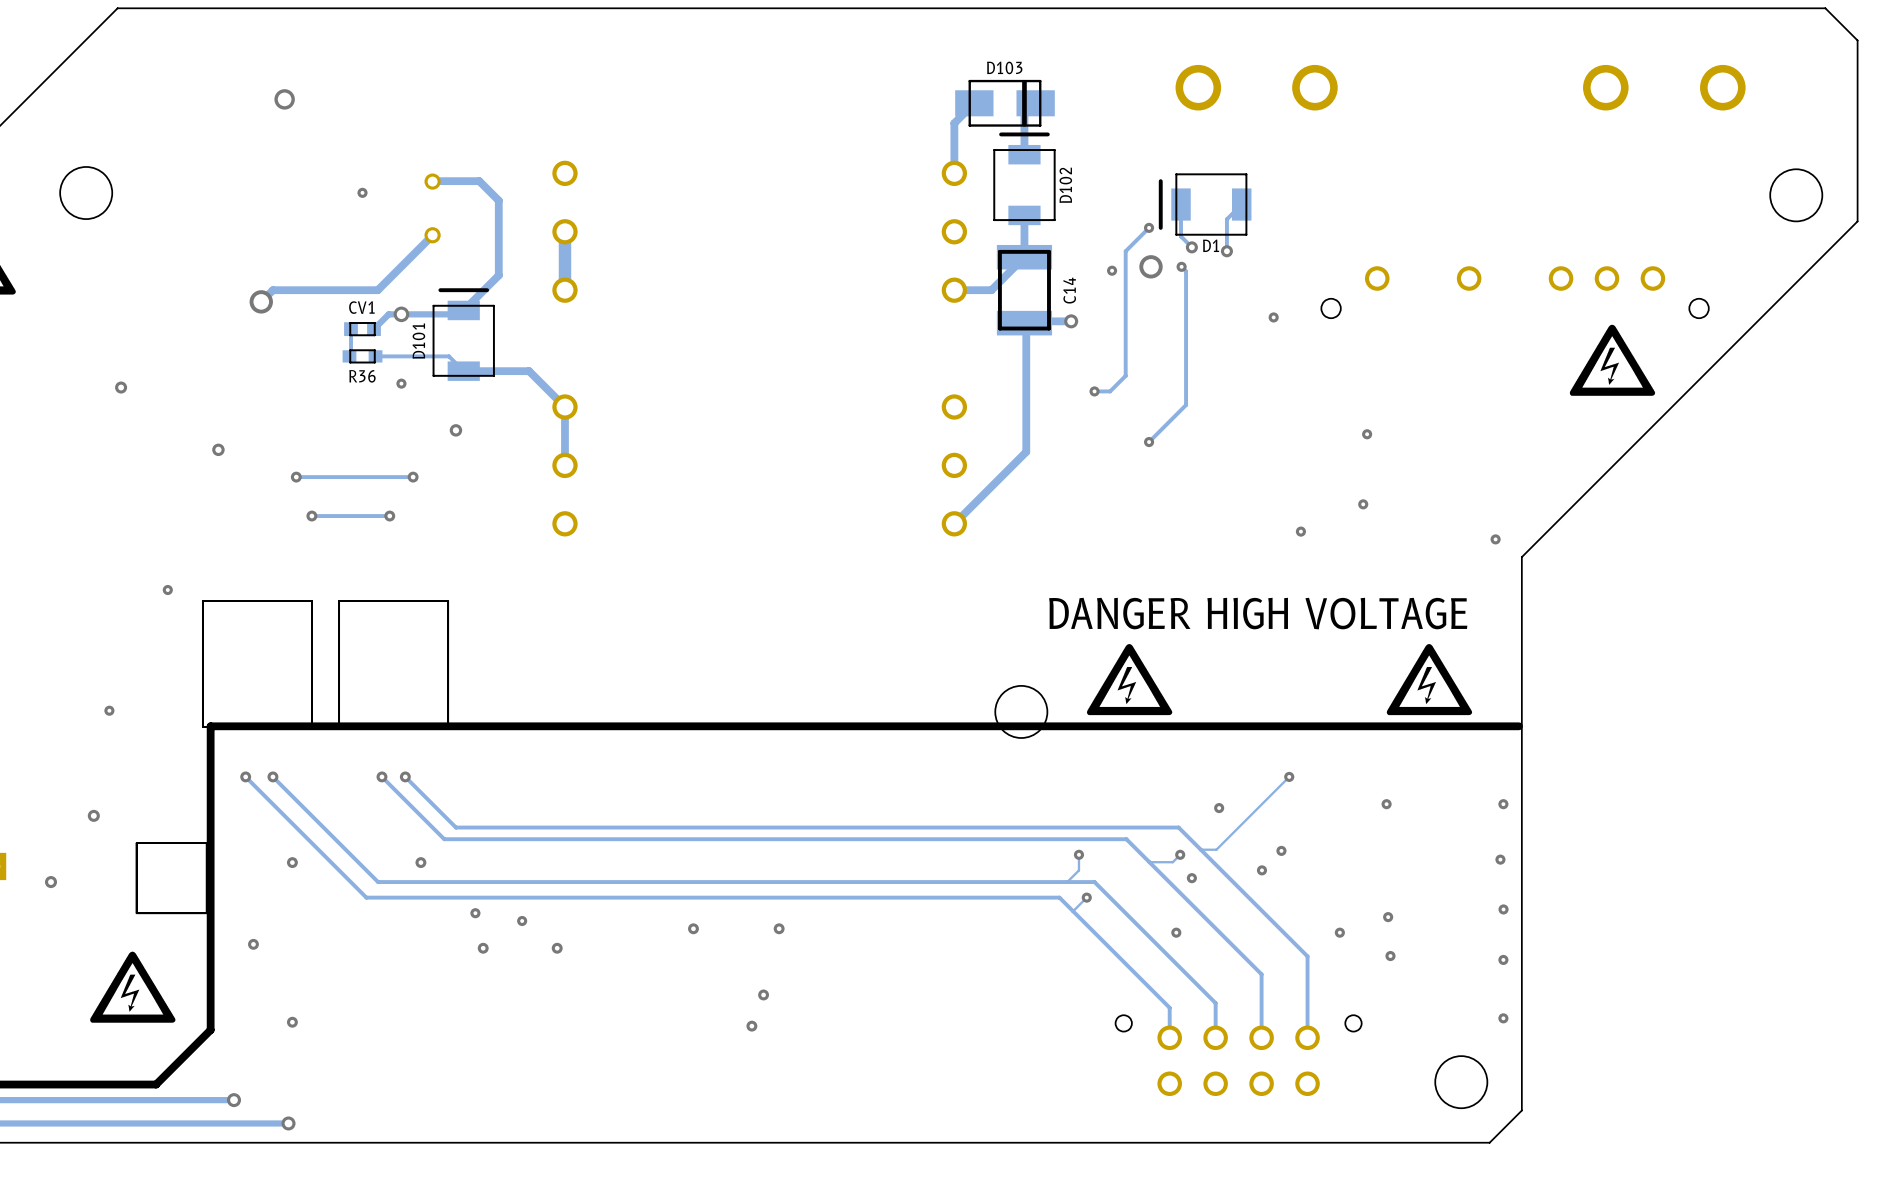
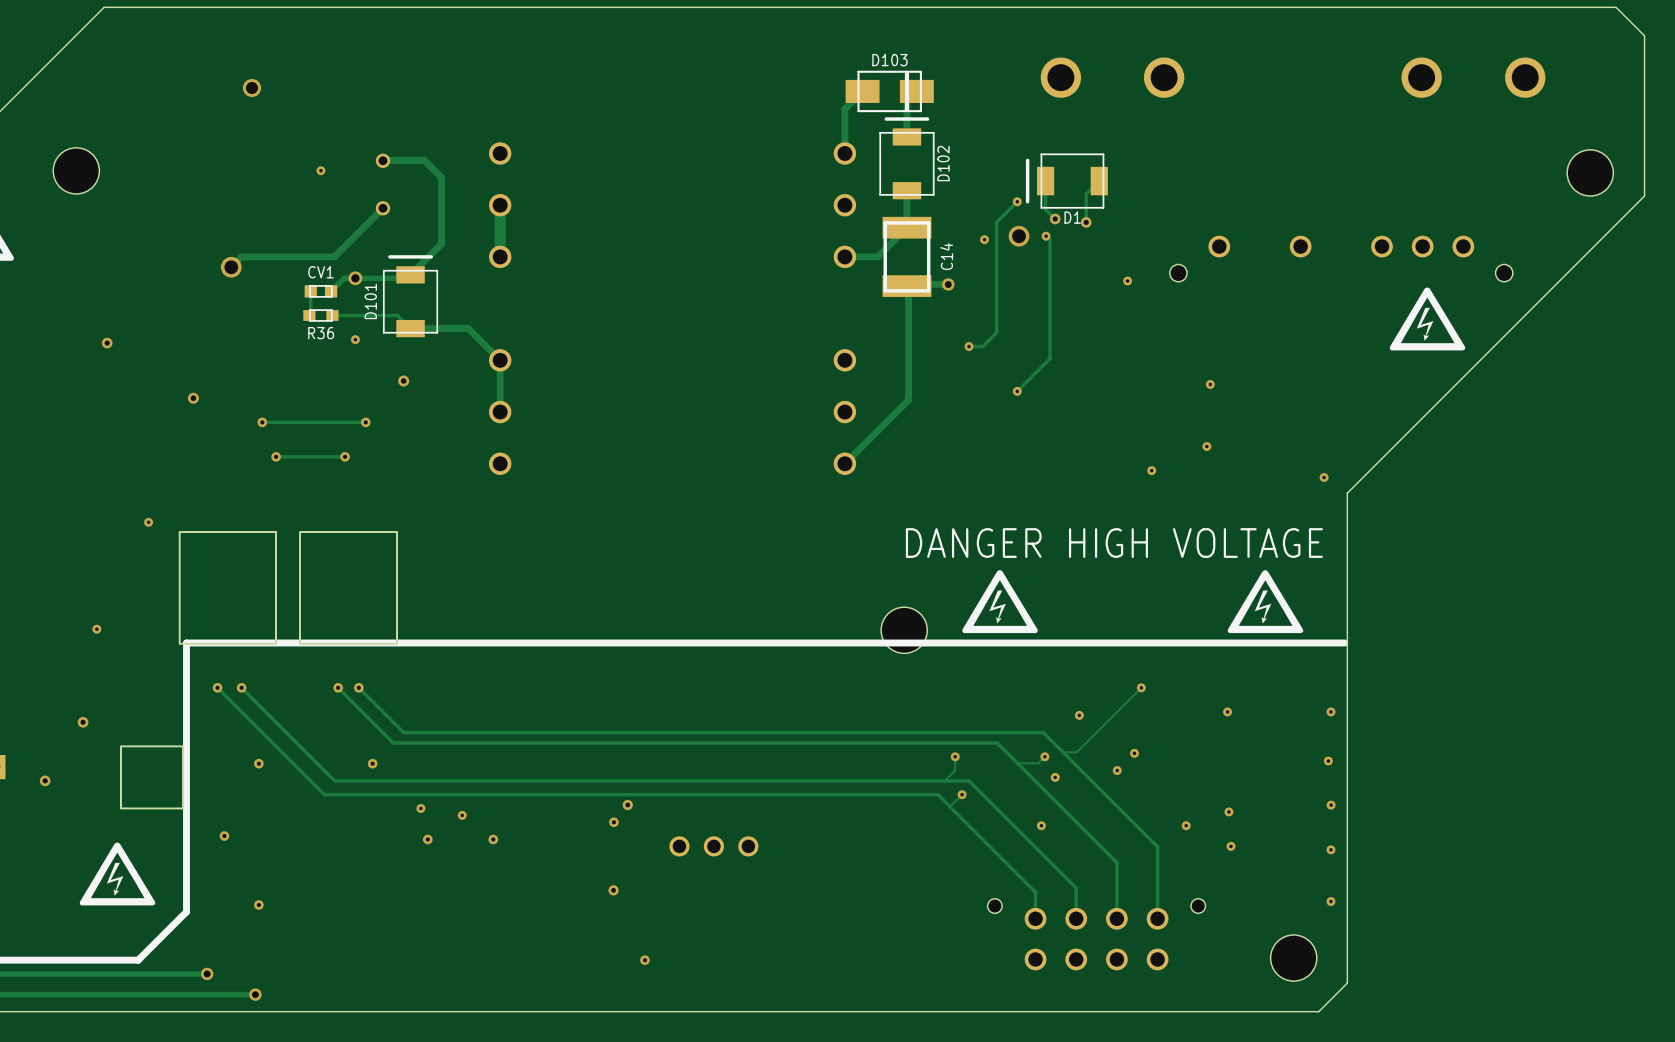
via: none -> (627, 805)
via: (779, 928) -> none
part: none -> (713, 846)
via: (763, 994) -> none
via: none -> (613, 890)
via: (751, 1026) -> none
via: none -> (644, 960)

